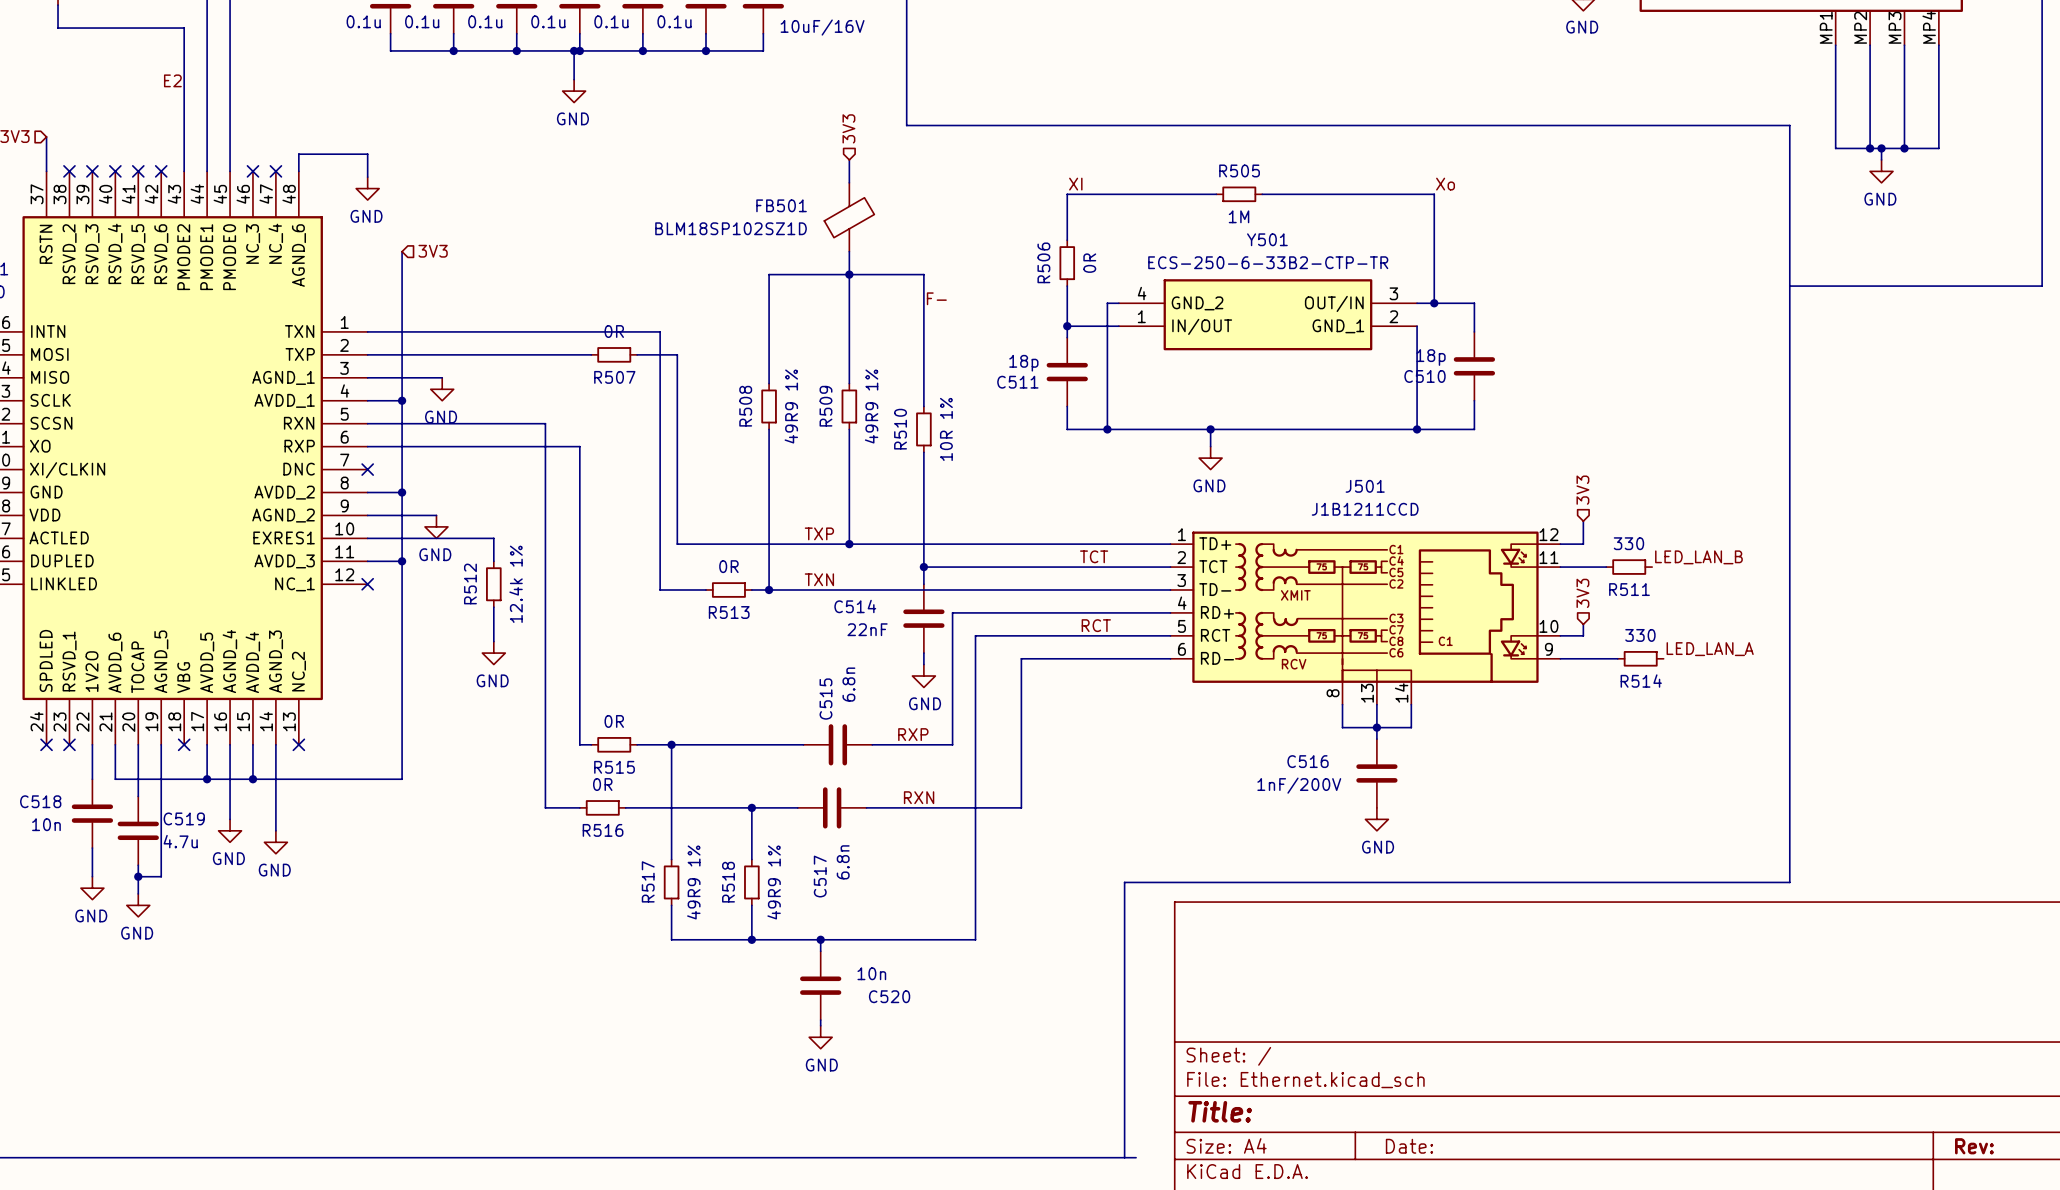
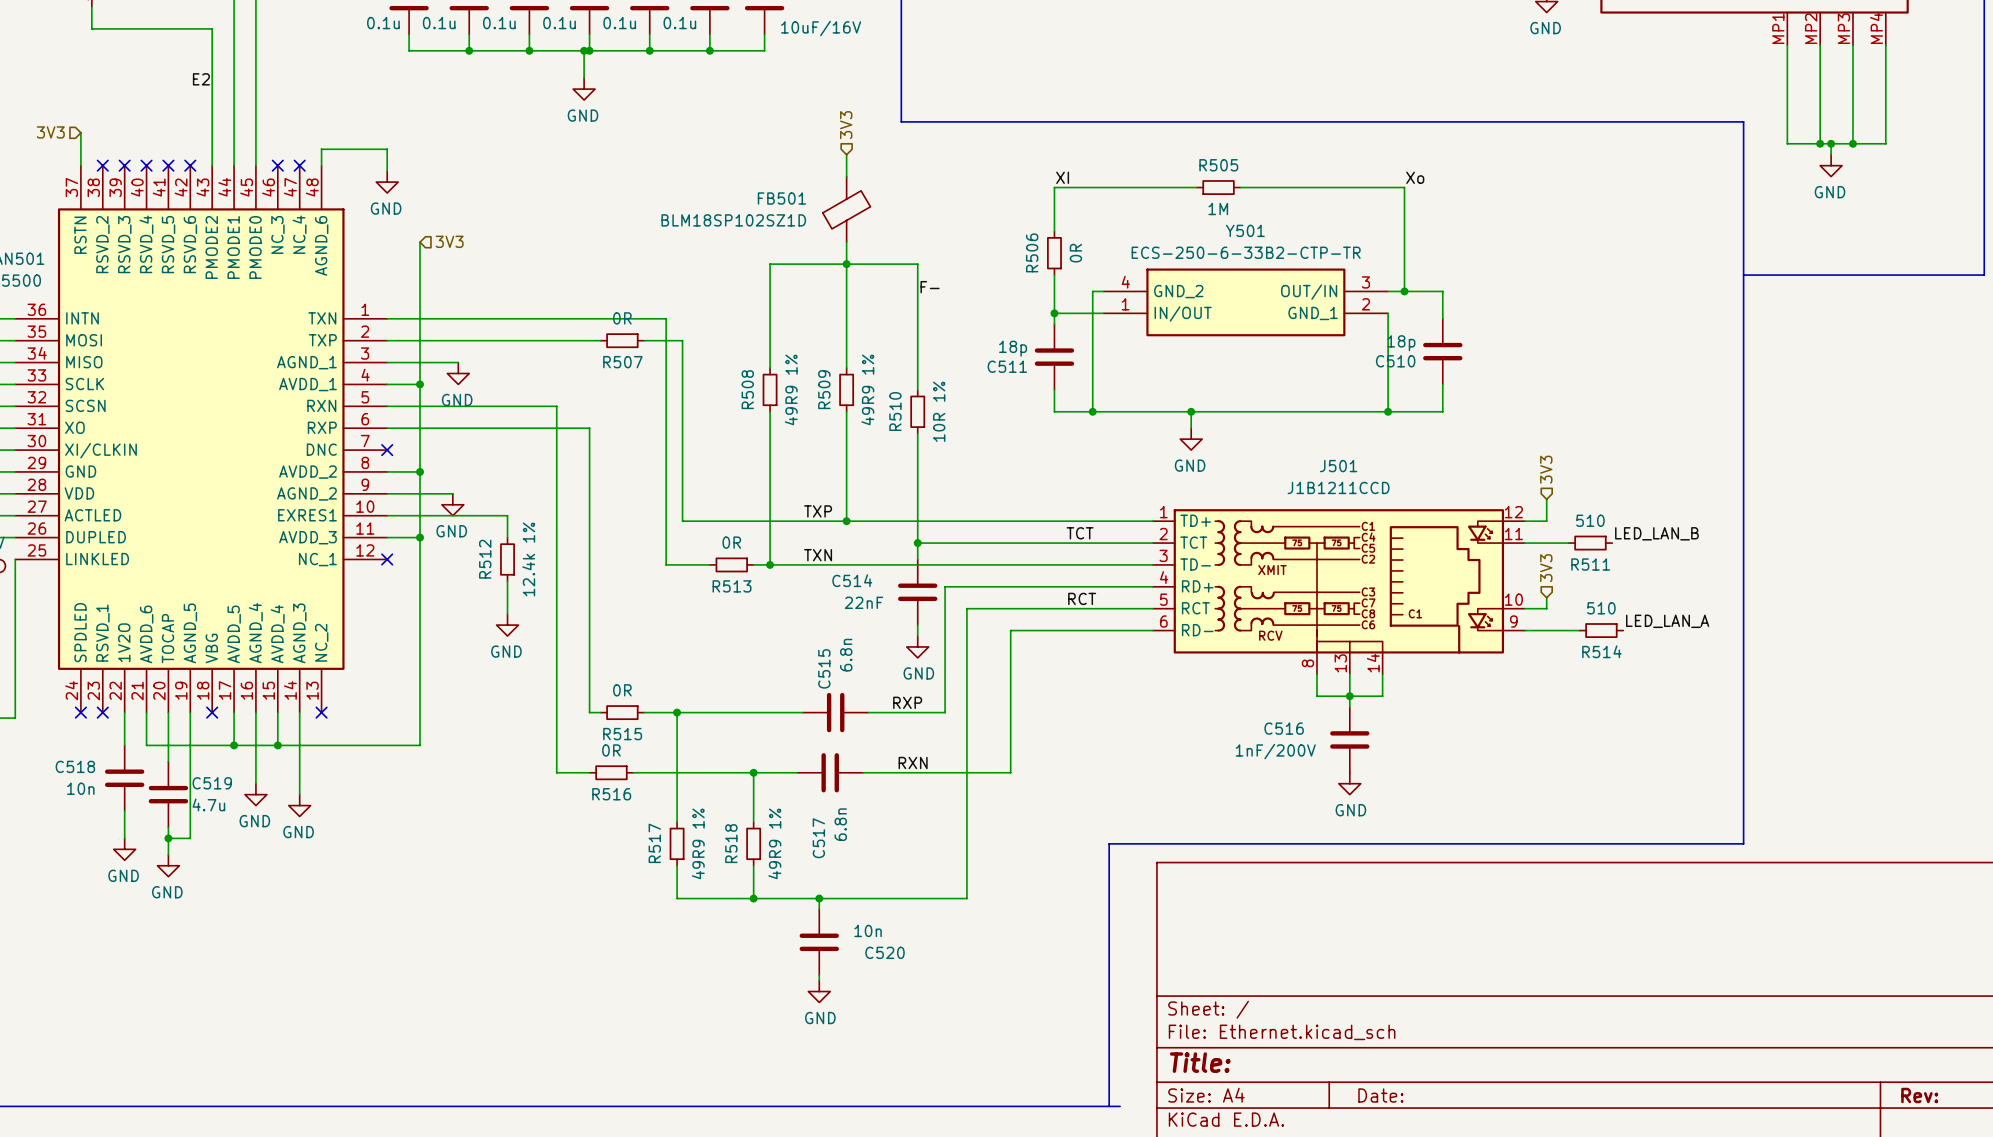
R511 value: 330 (1628, 543) -> 510 (1590, 520)
R514 value: 330 (1640, 635) -> 510 (1601, 608)

